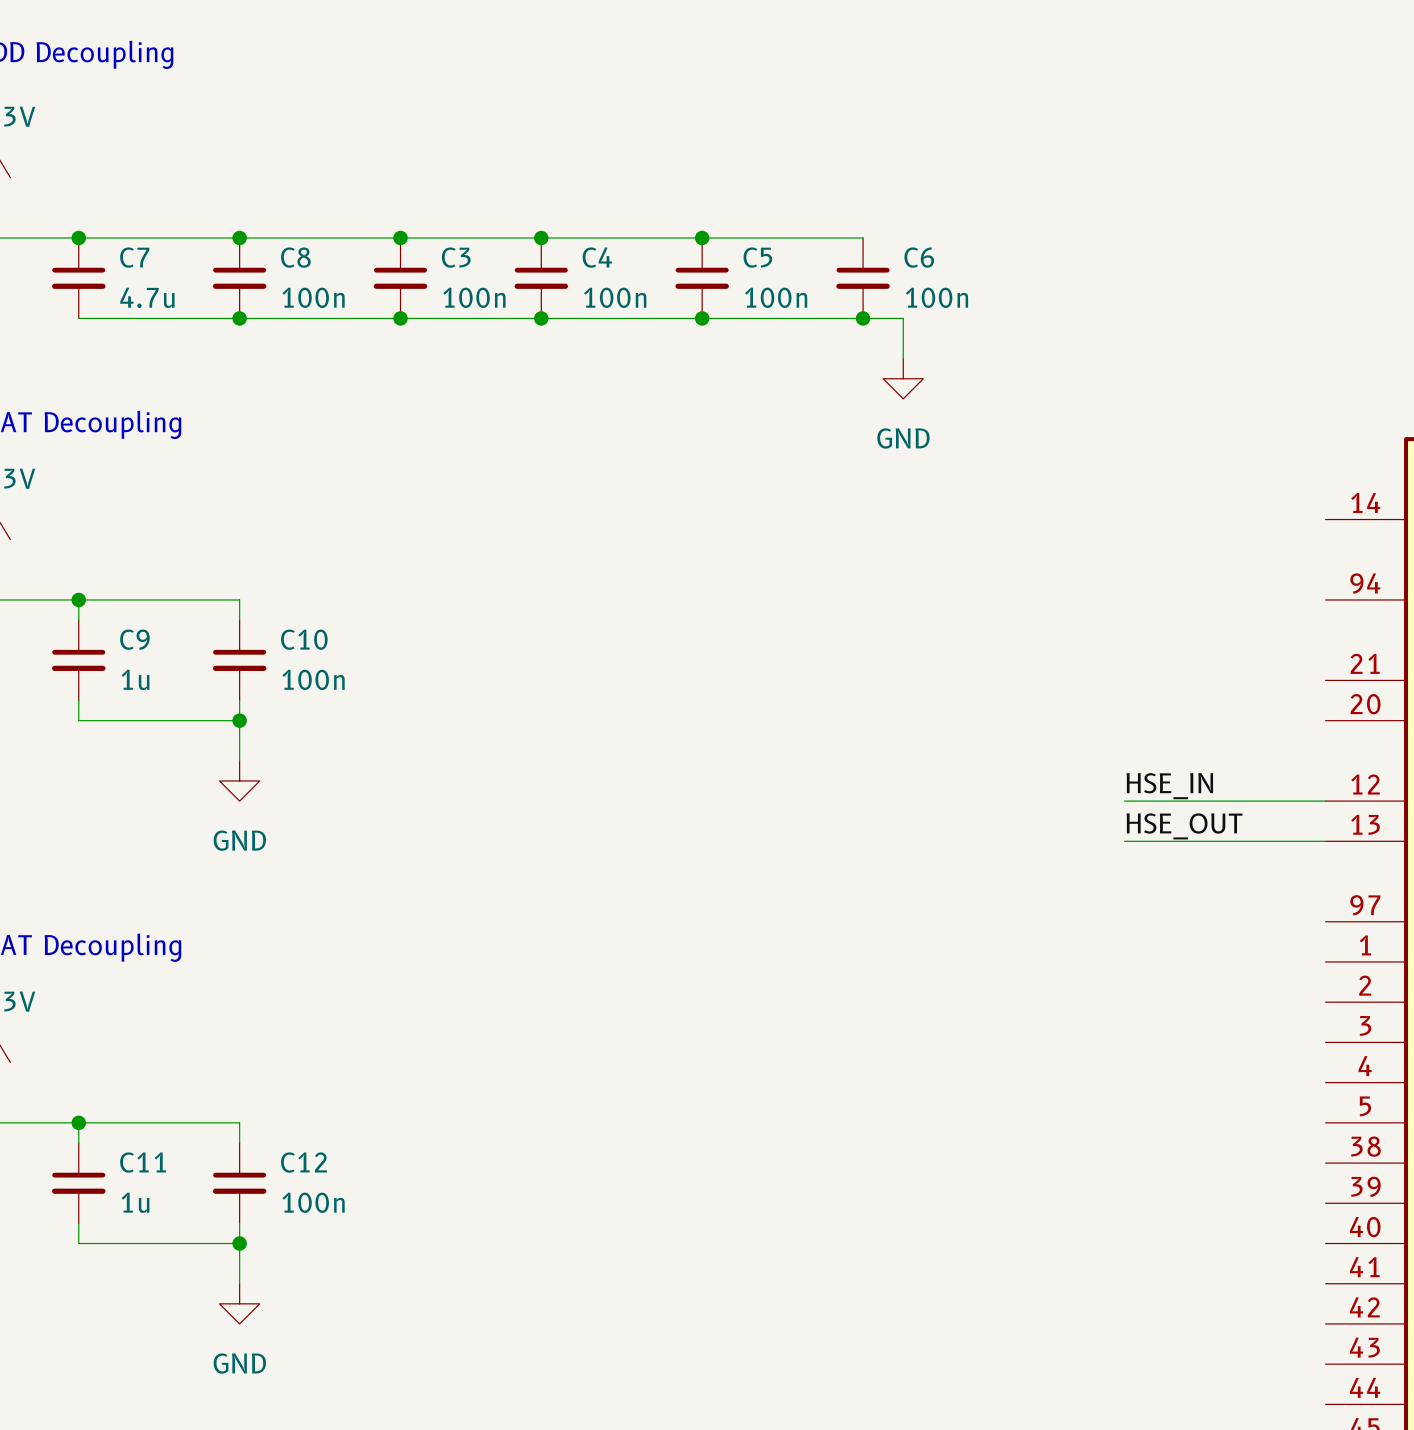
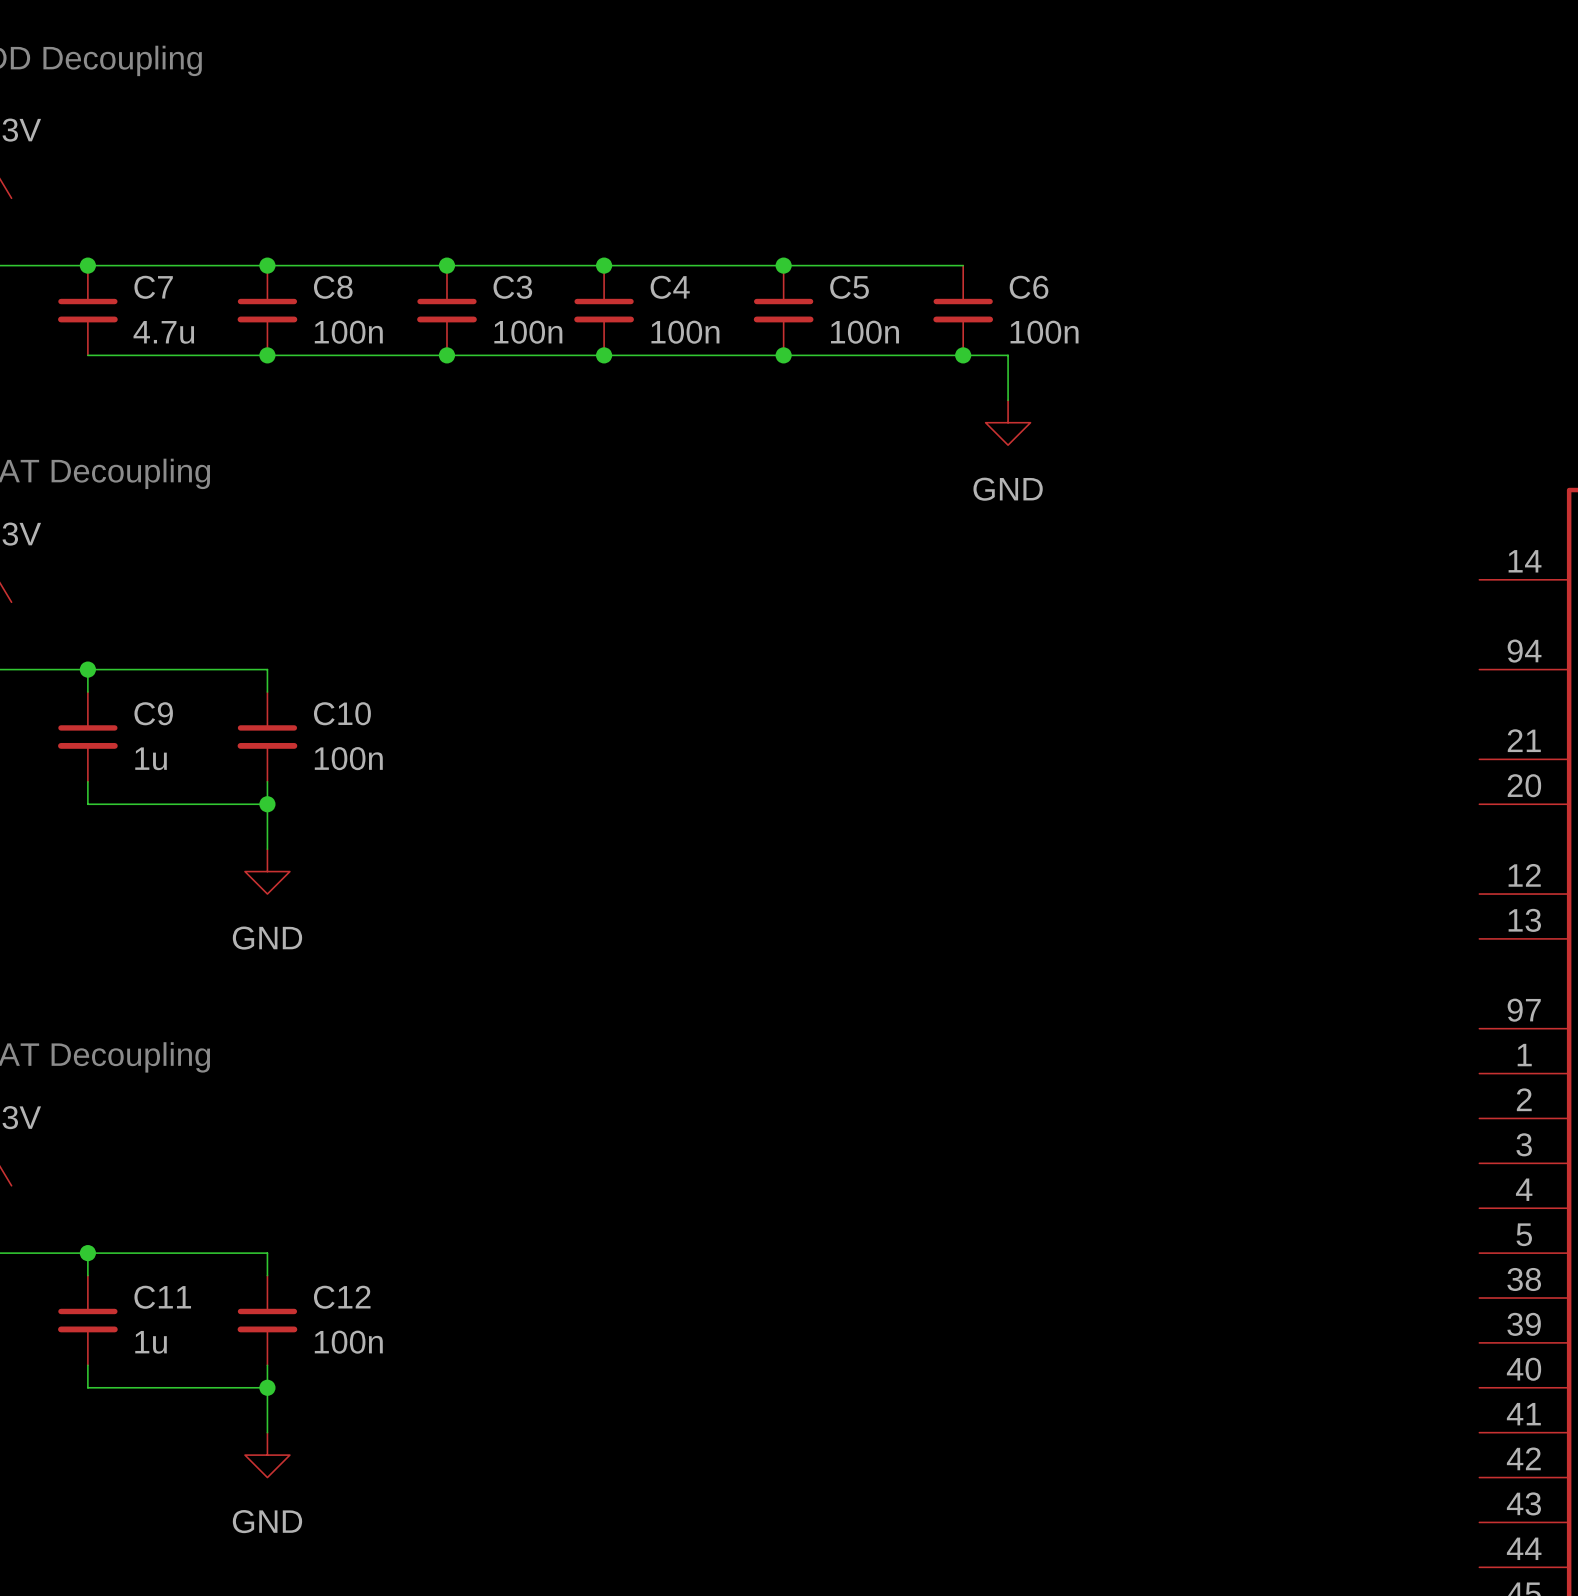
label: HSE_IN (1169, 786) -> none
wire: (1124, 801) (1325, 801) -> none
label: HSE_OUT (1184, 826) -> none
wire: (1124, 841) (1325, 841) -> none

